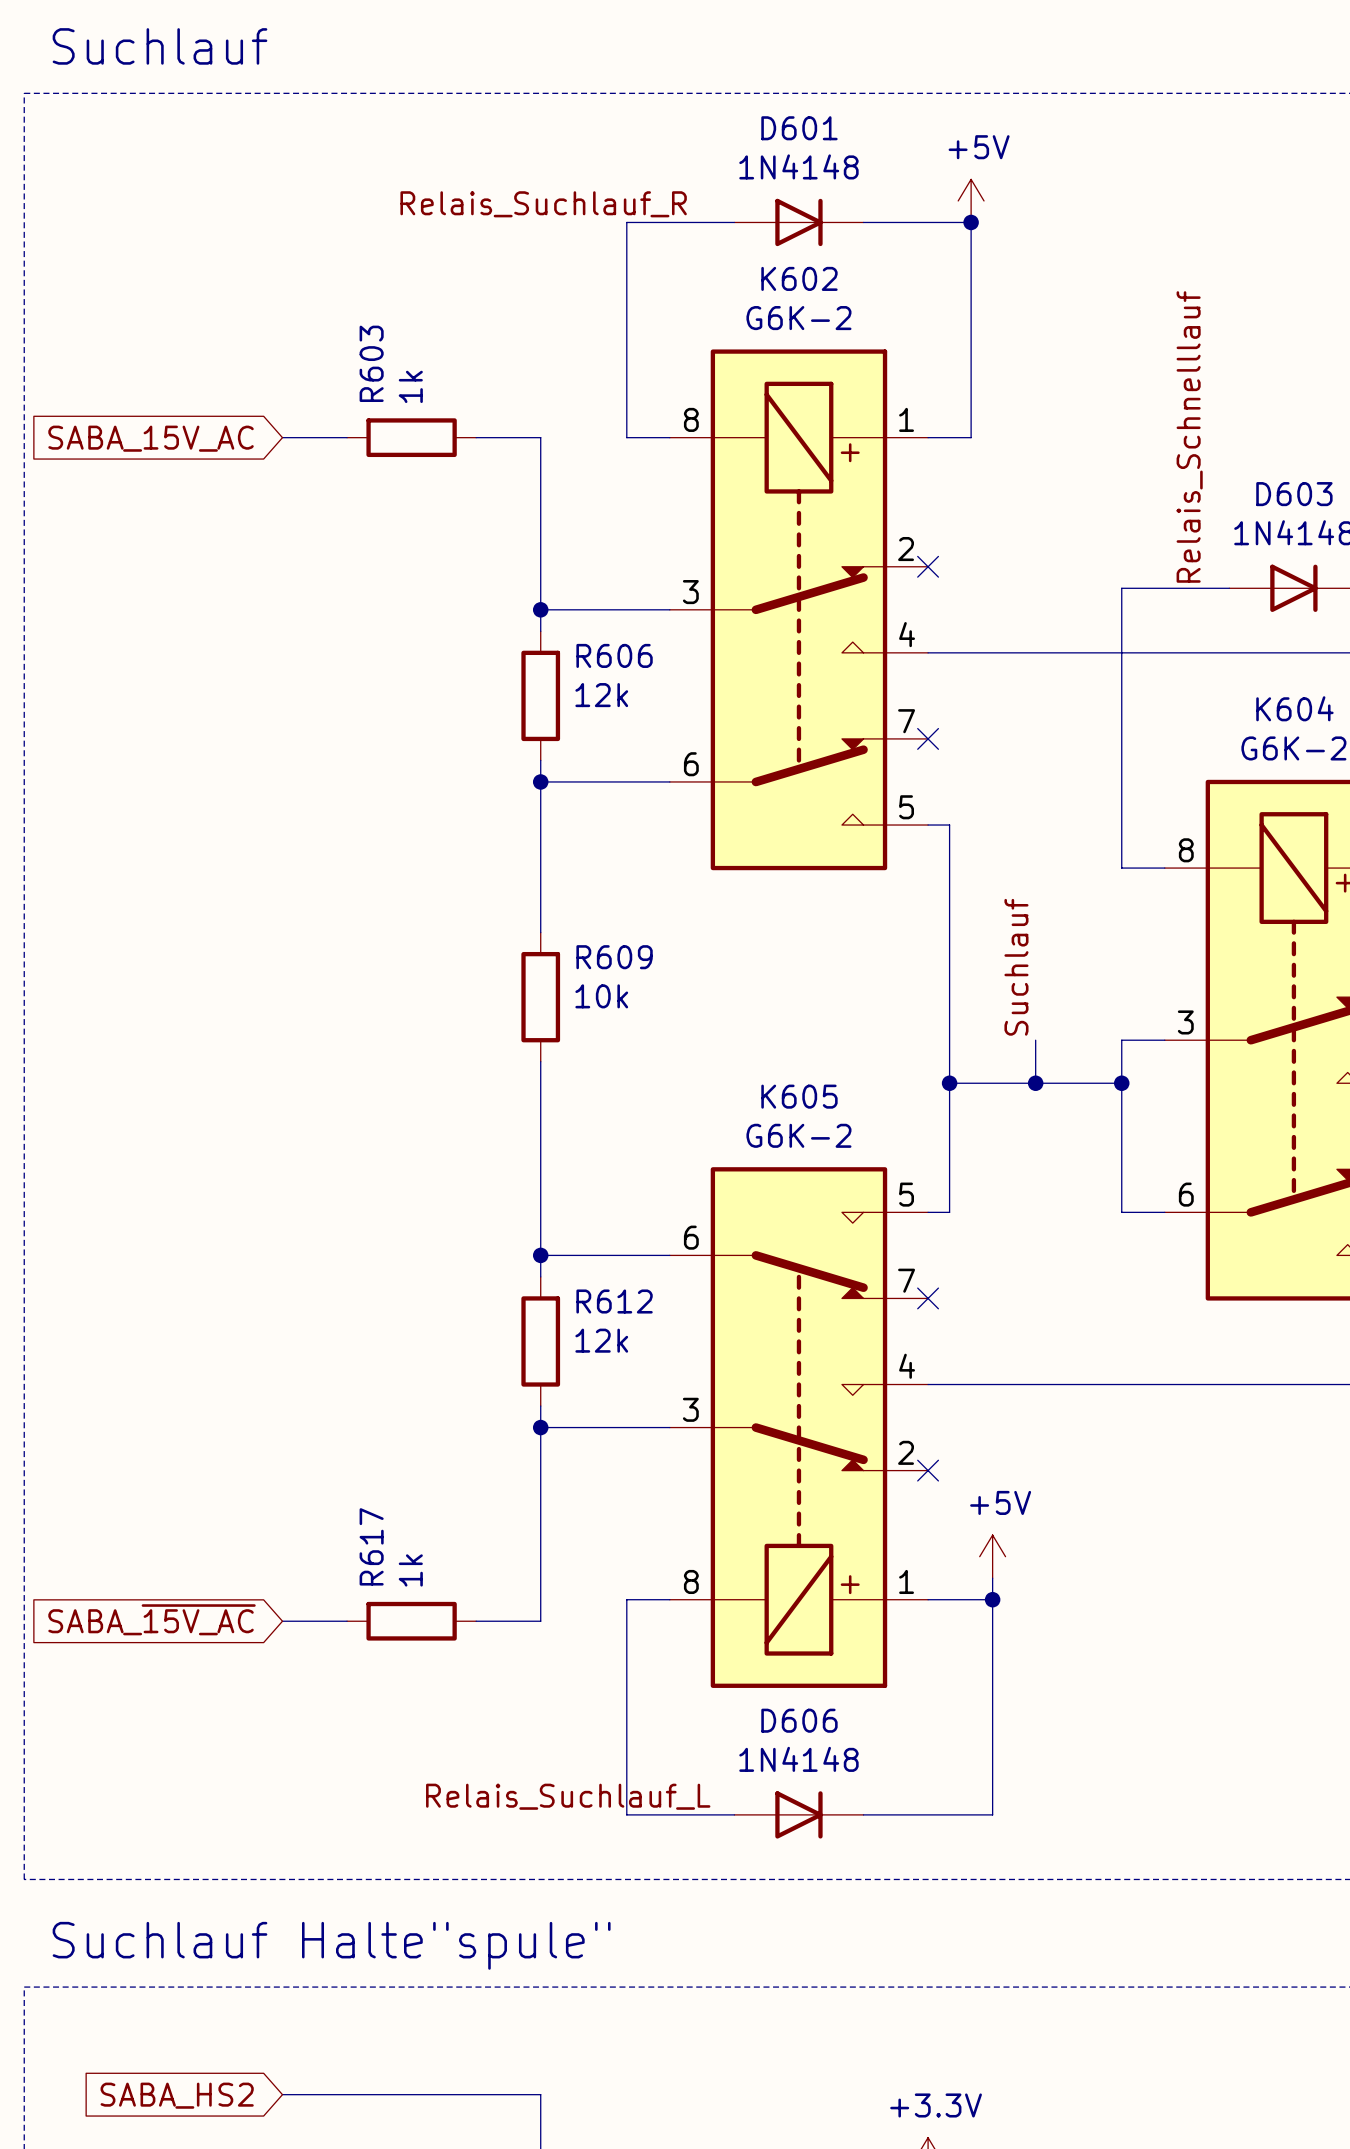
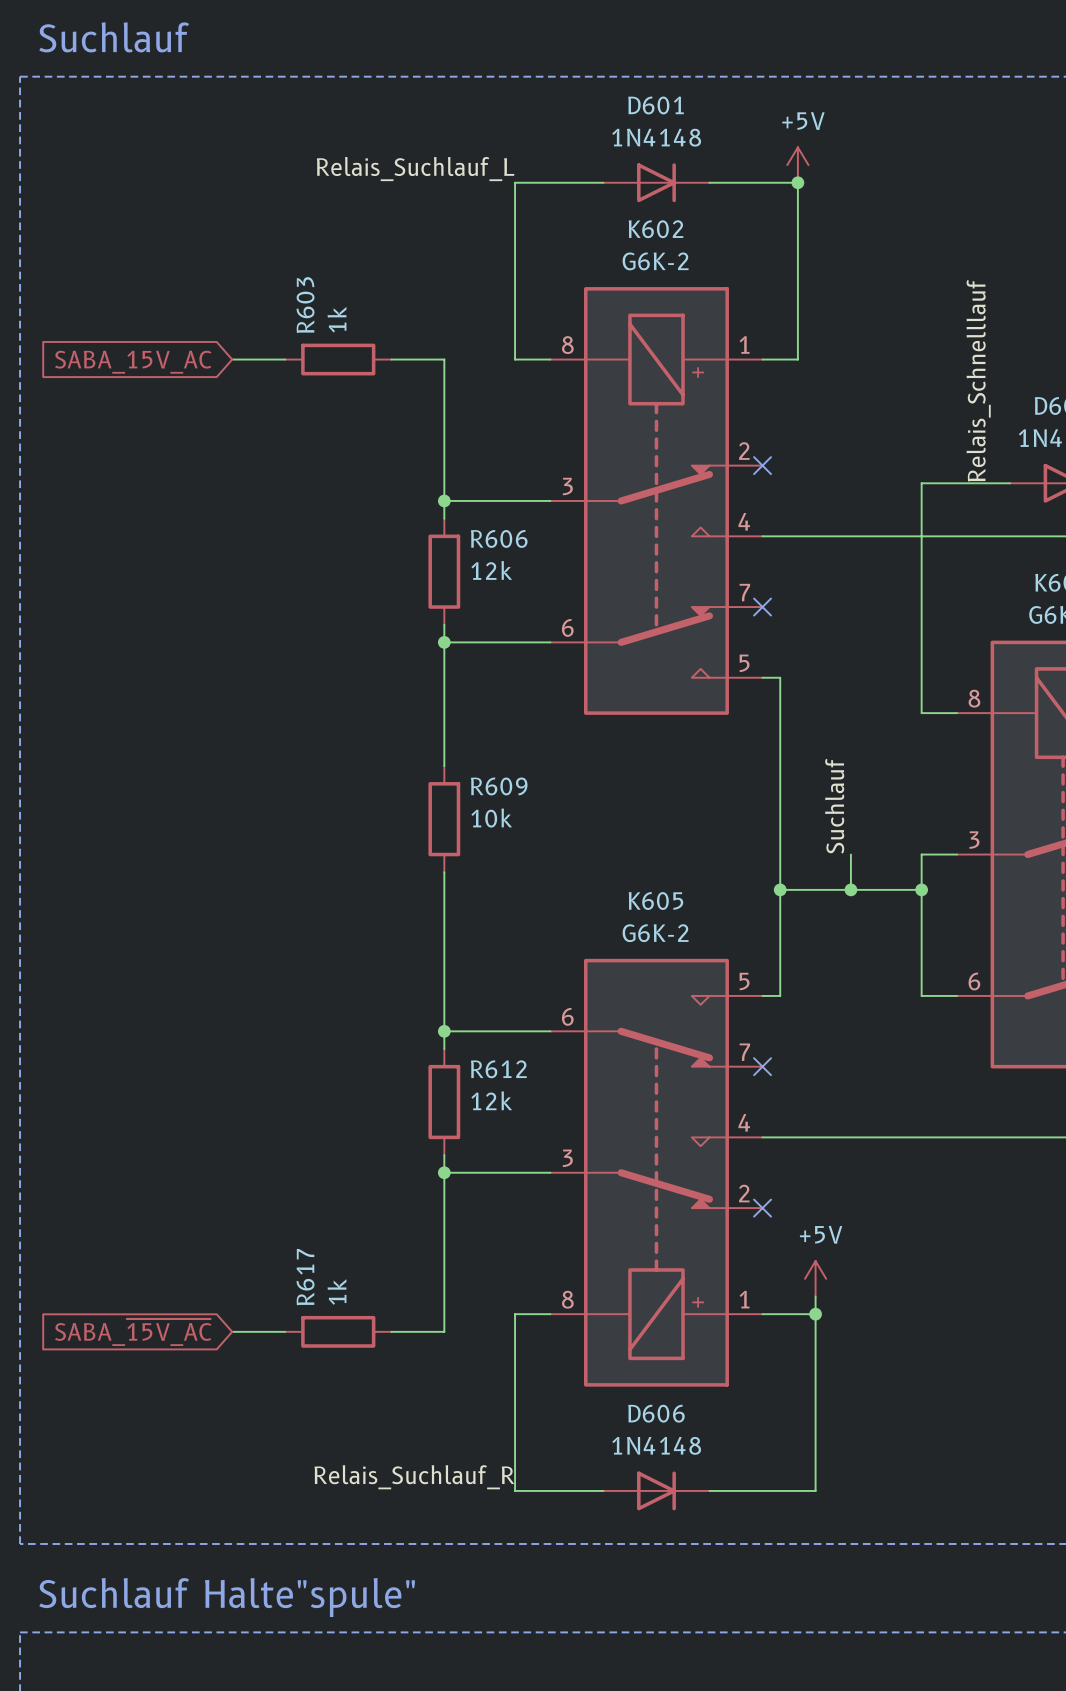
label: Relais_Suchlauf_R (543, 204) -> Relais_Suchlauf_L (415, 169)
label: Relais_Suchlauf_L (568, 1796) -> Relais_Suchlauf_R (414, 1477)

